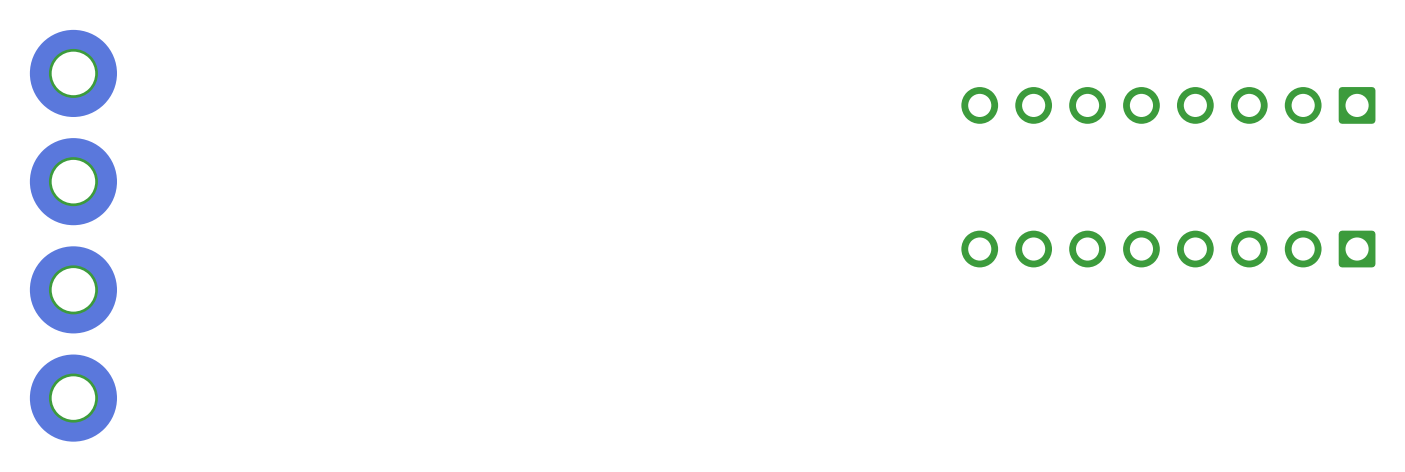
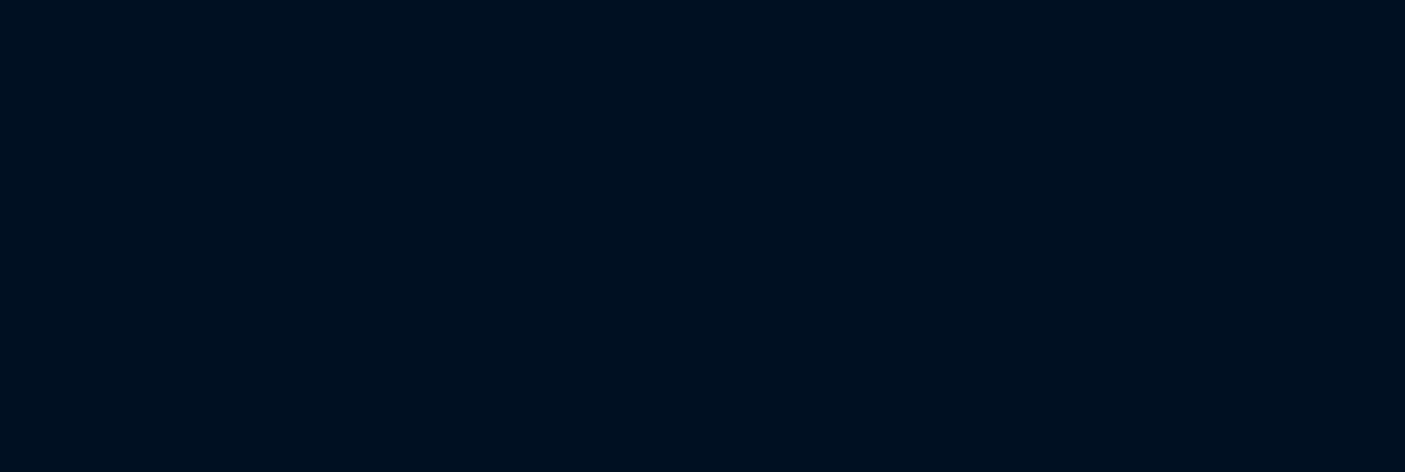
part: (73, 73) -> none
part: (1168, 105) -> none
part: (73, 181) -> none
part: (1168, 249) -> none
part: (73, 289) -> none
part: (73, 398) -> none

